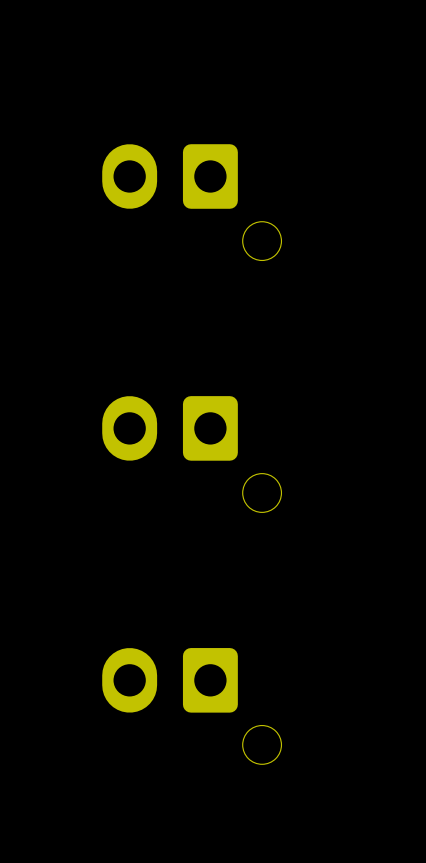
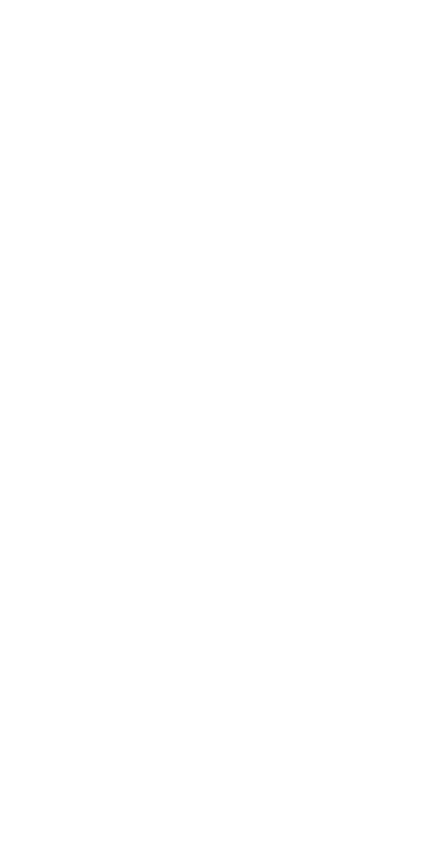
part: (191, 202) -> none
part: (191, 454) -> none
part: (191, 706) -> none

